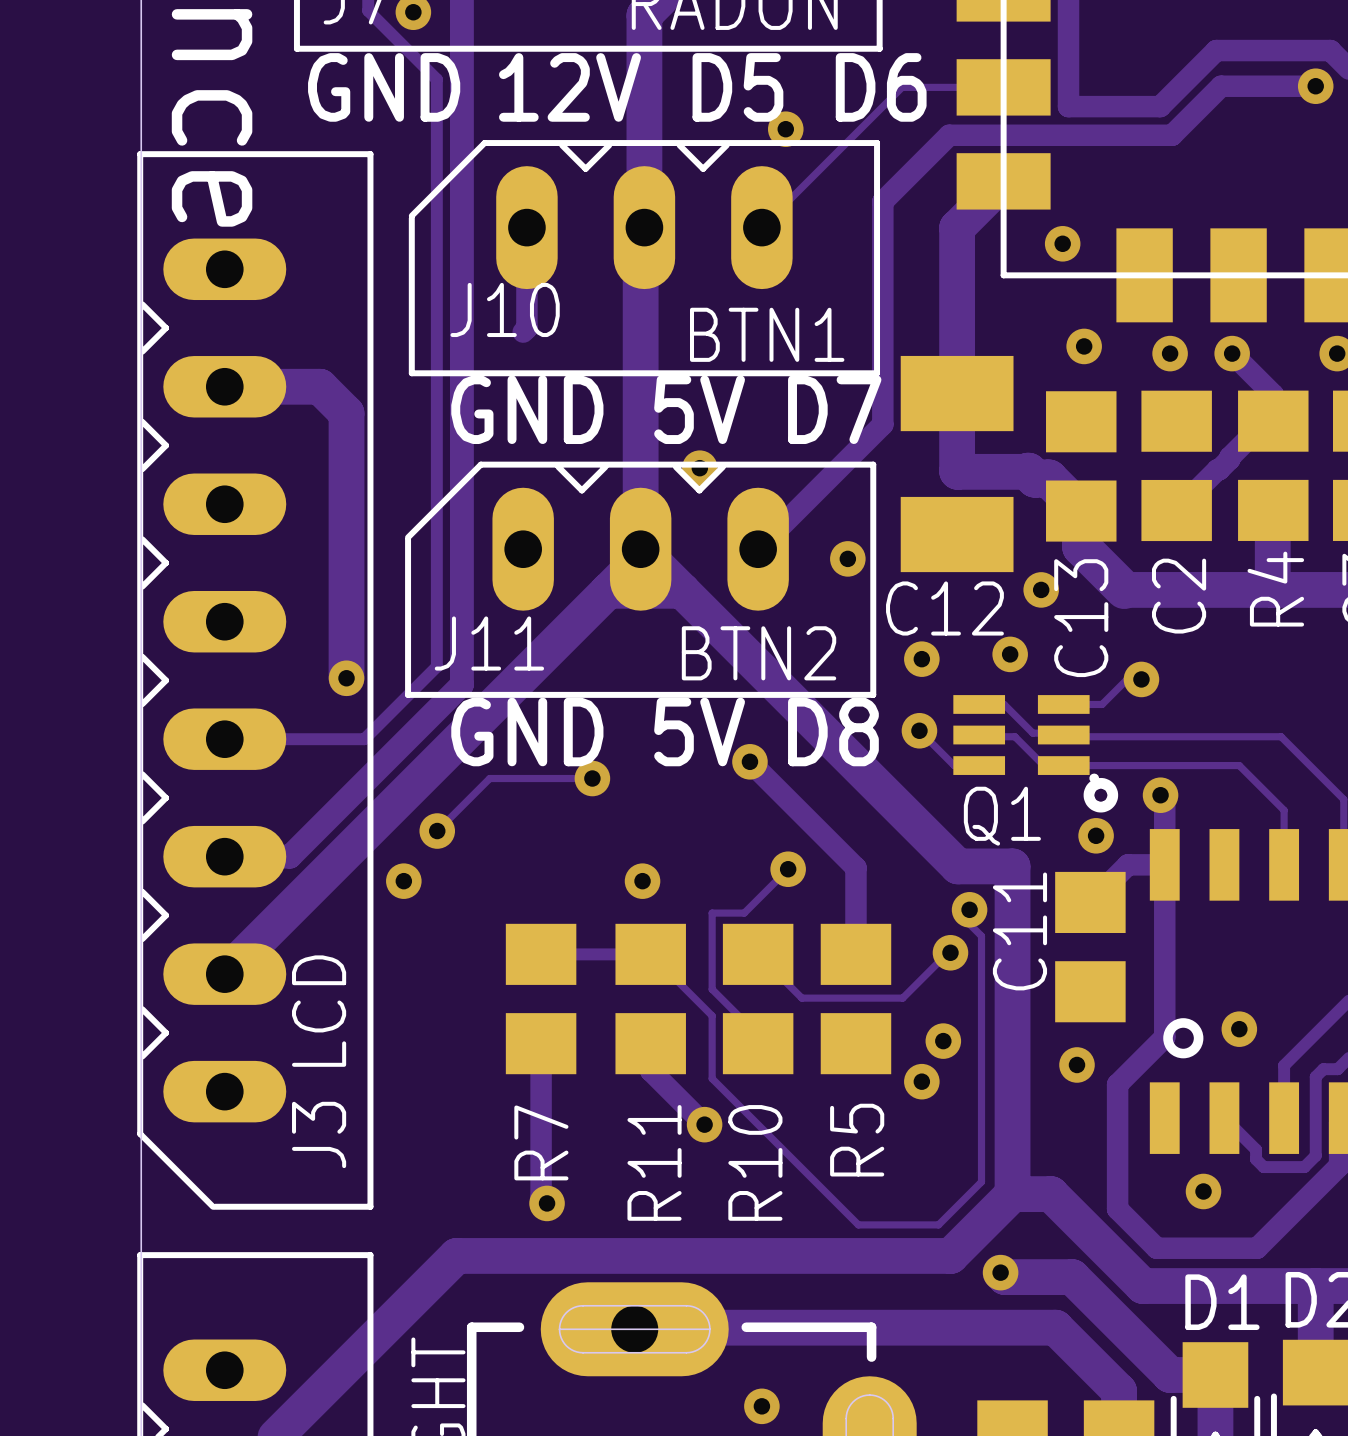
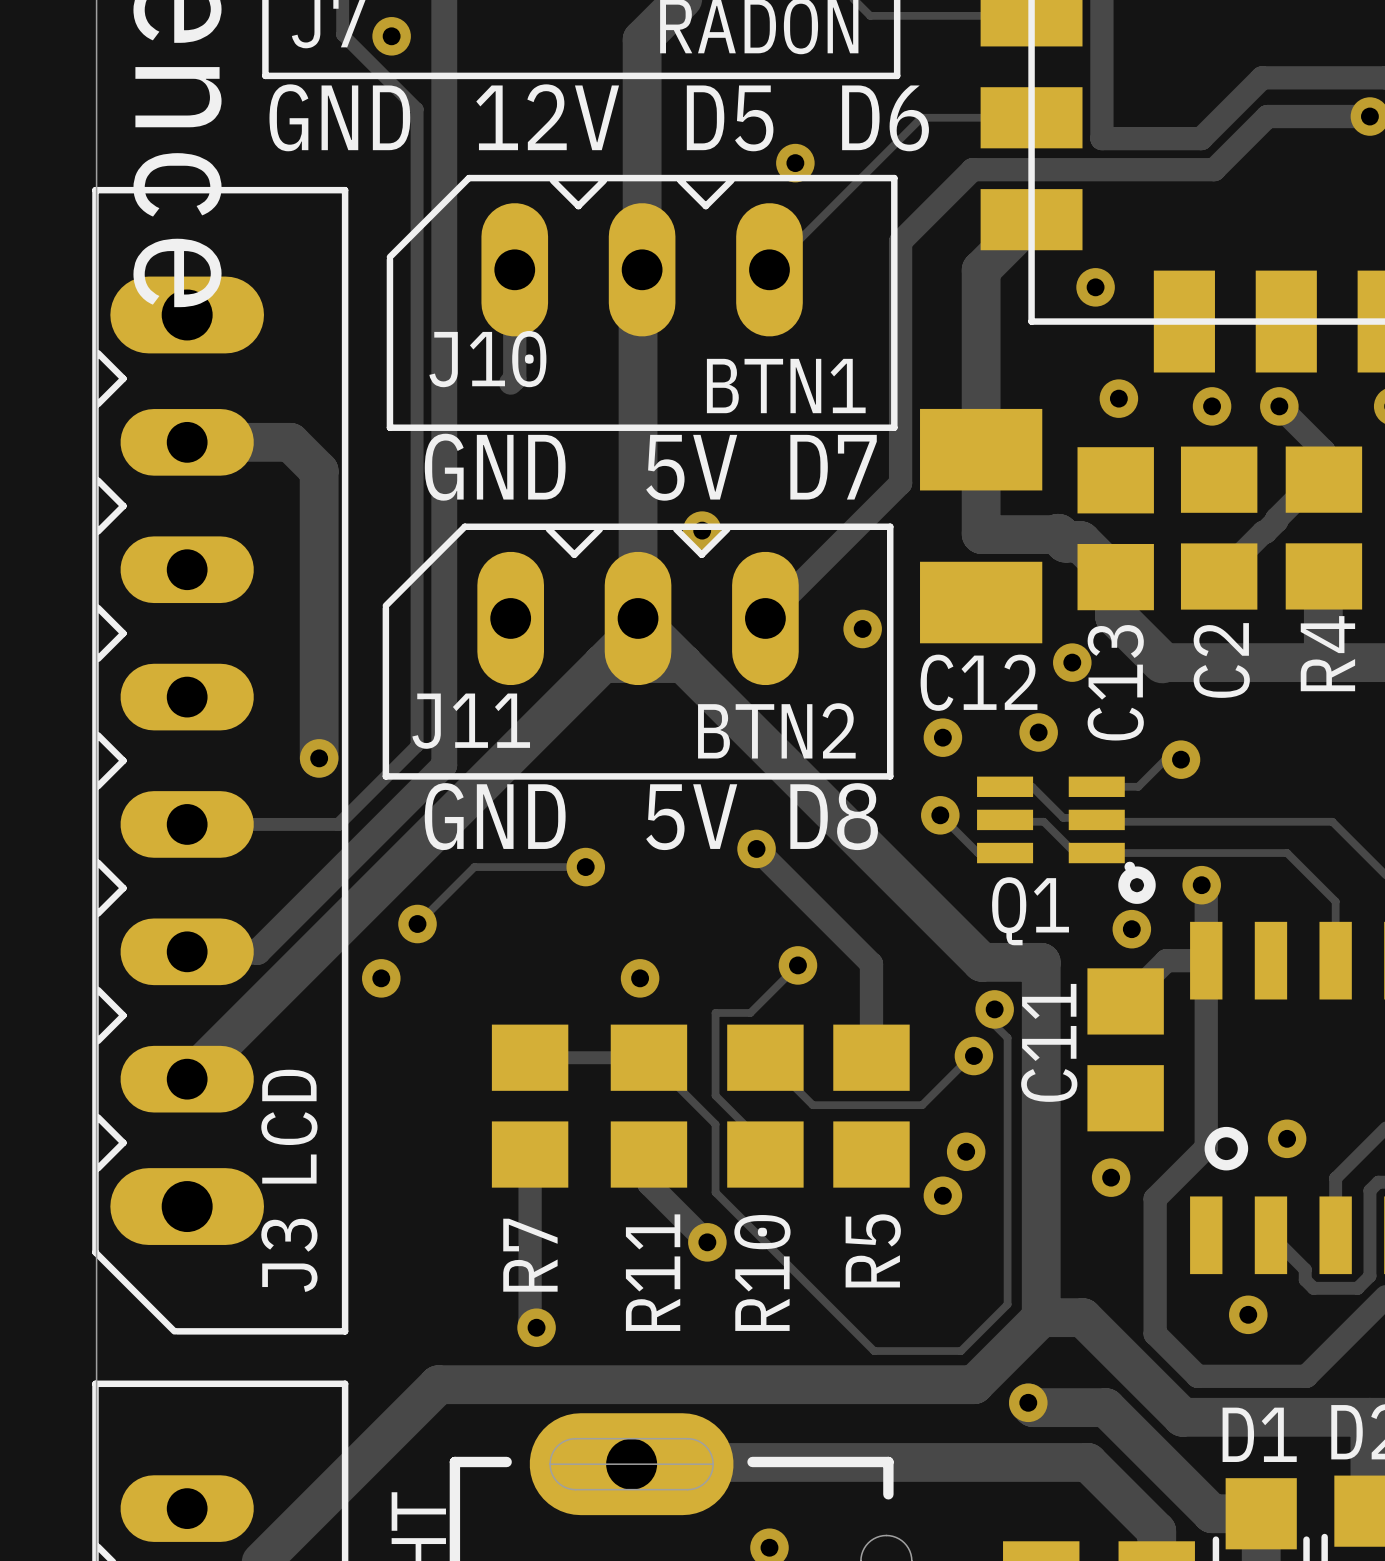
J3 footprint: [137, 151, 374, 1210] -> [92, 186, 349, 1335]

